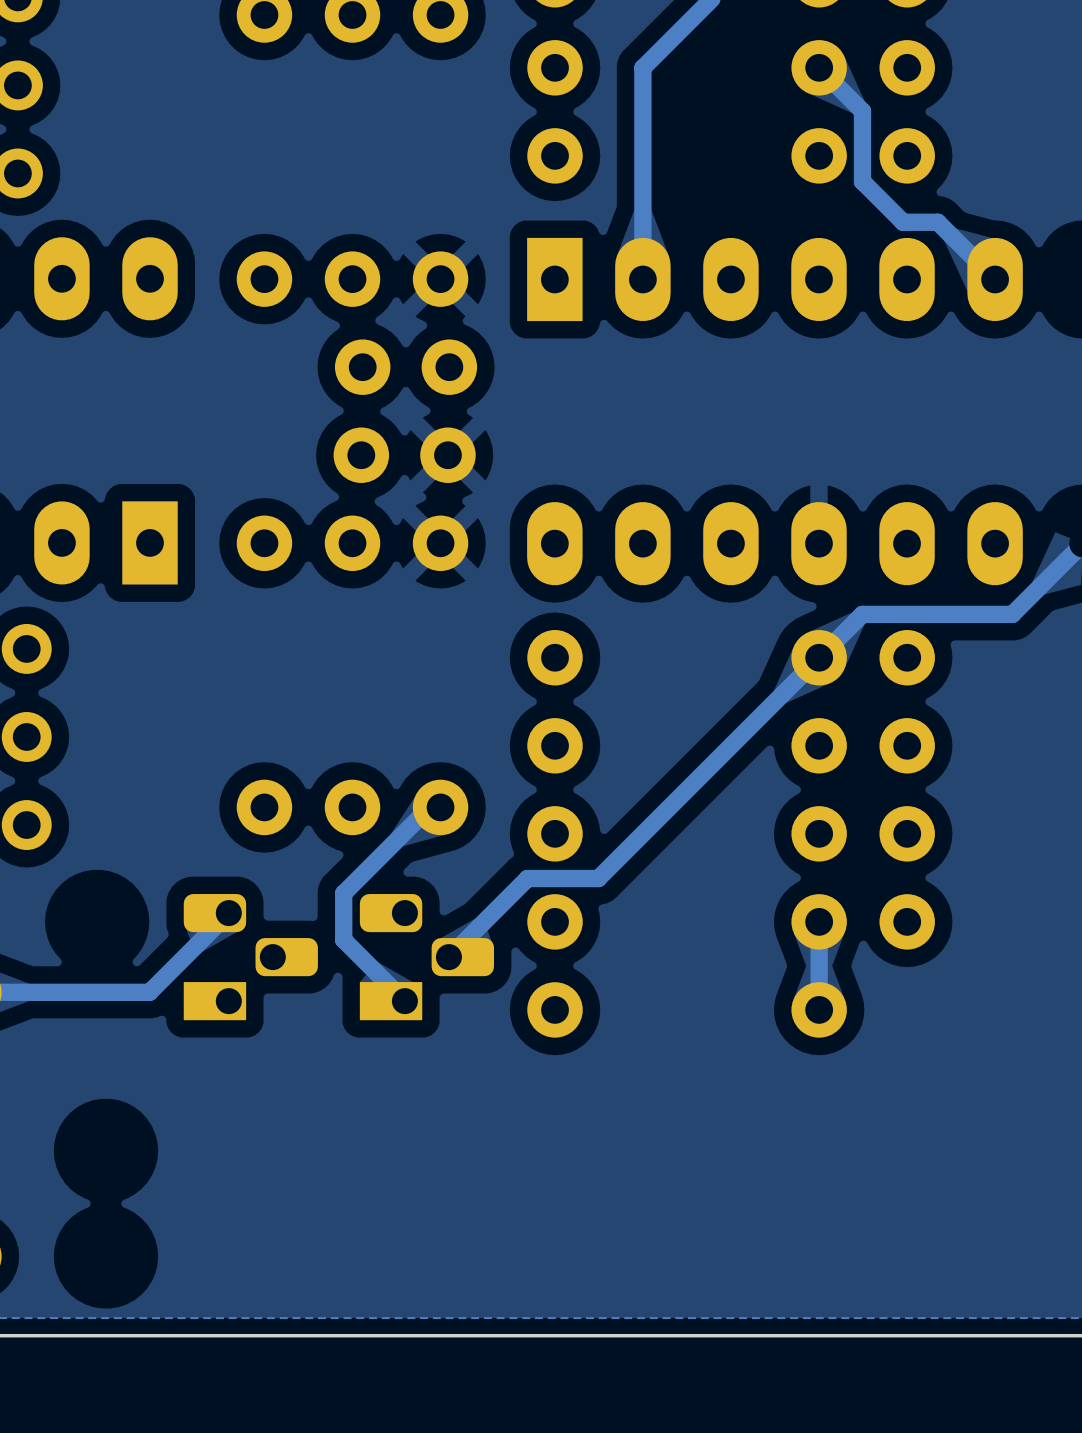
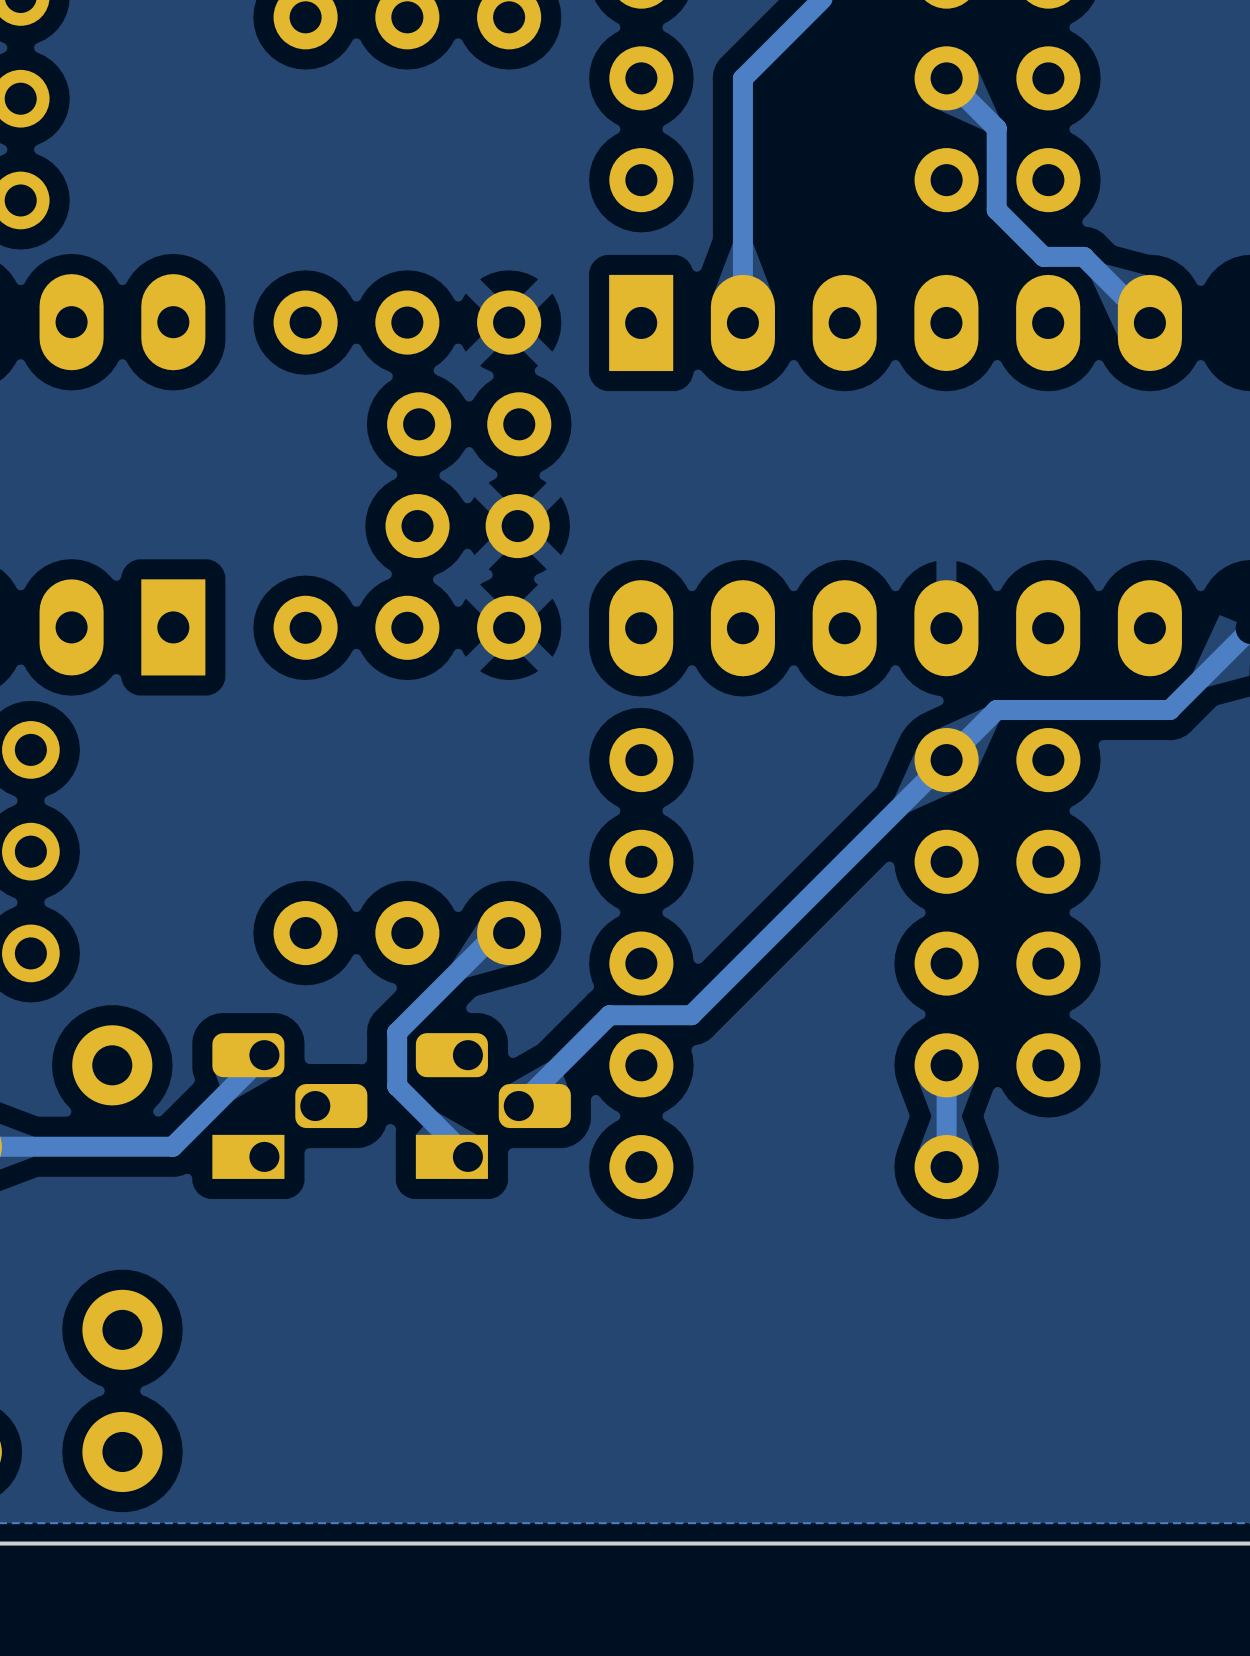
part: none -> (112, 1065)
part: none -> (122, 1329)
part: none -> (122, 1451)

